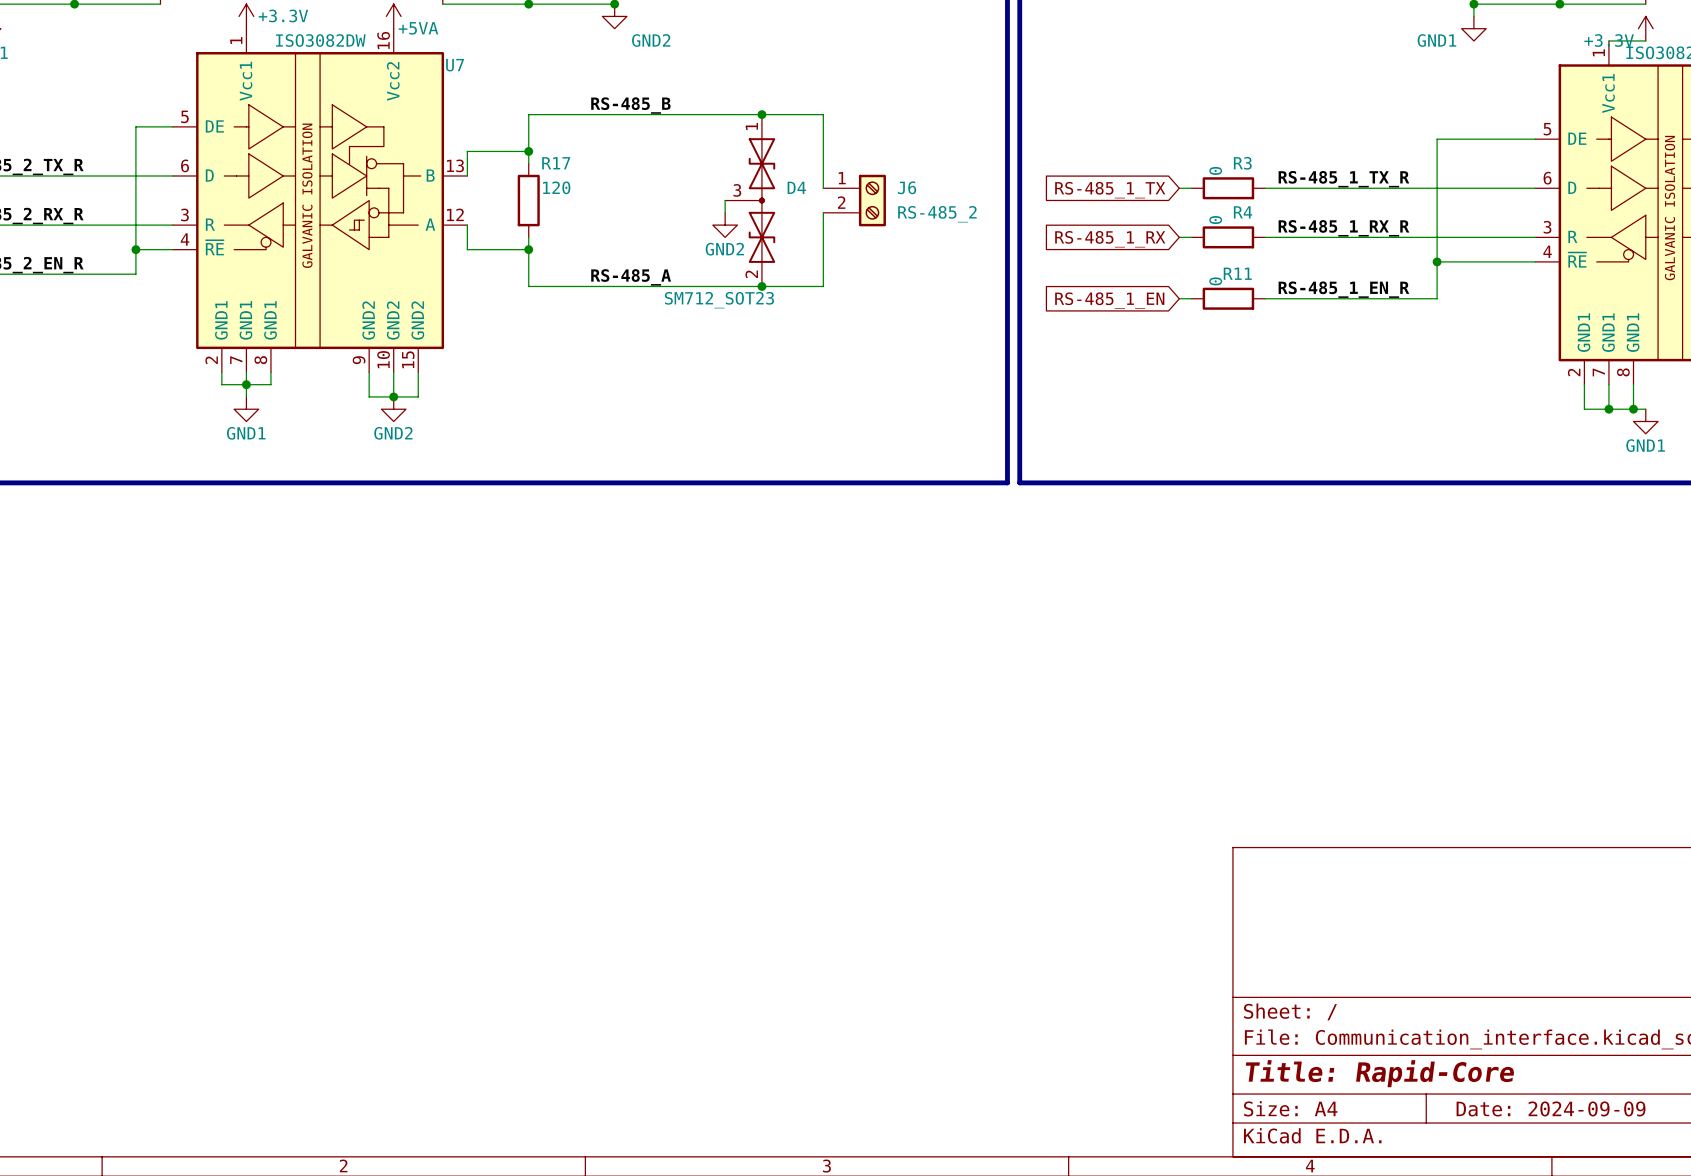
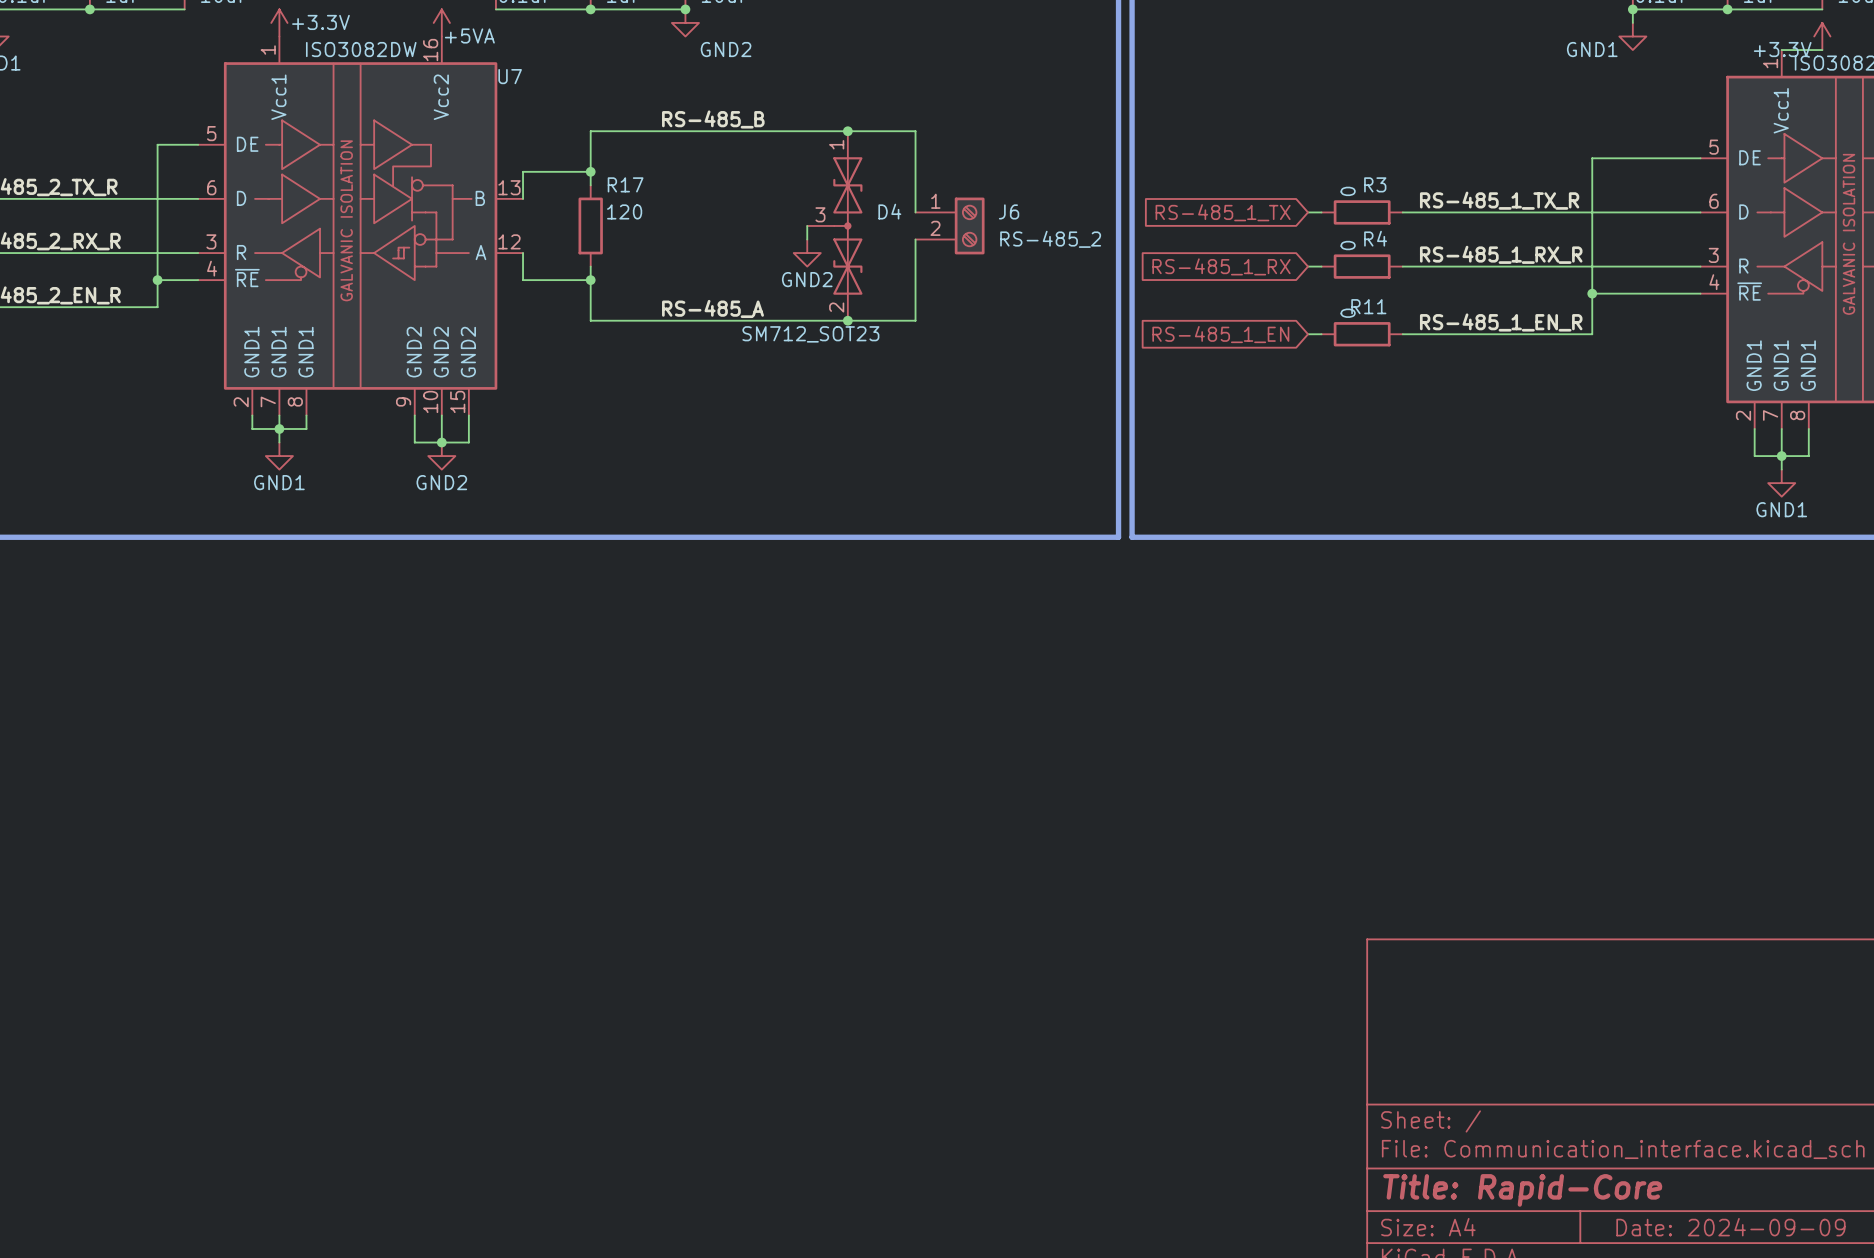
wire: none -> (1781, 456) (1781, 469)
wire: (1633, 409) (1645, 409) -> none
junction: (1633, 409) -> none
power symbol position: GND1 (1645, 421) -> GND1 (1781, 483)

